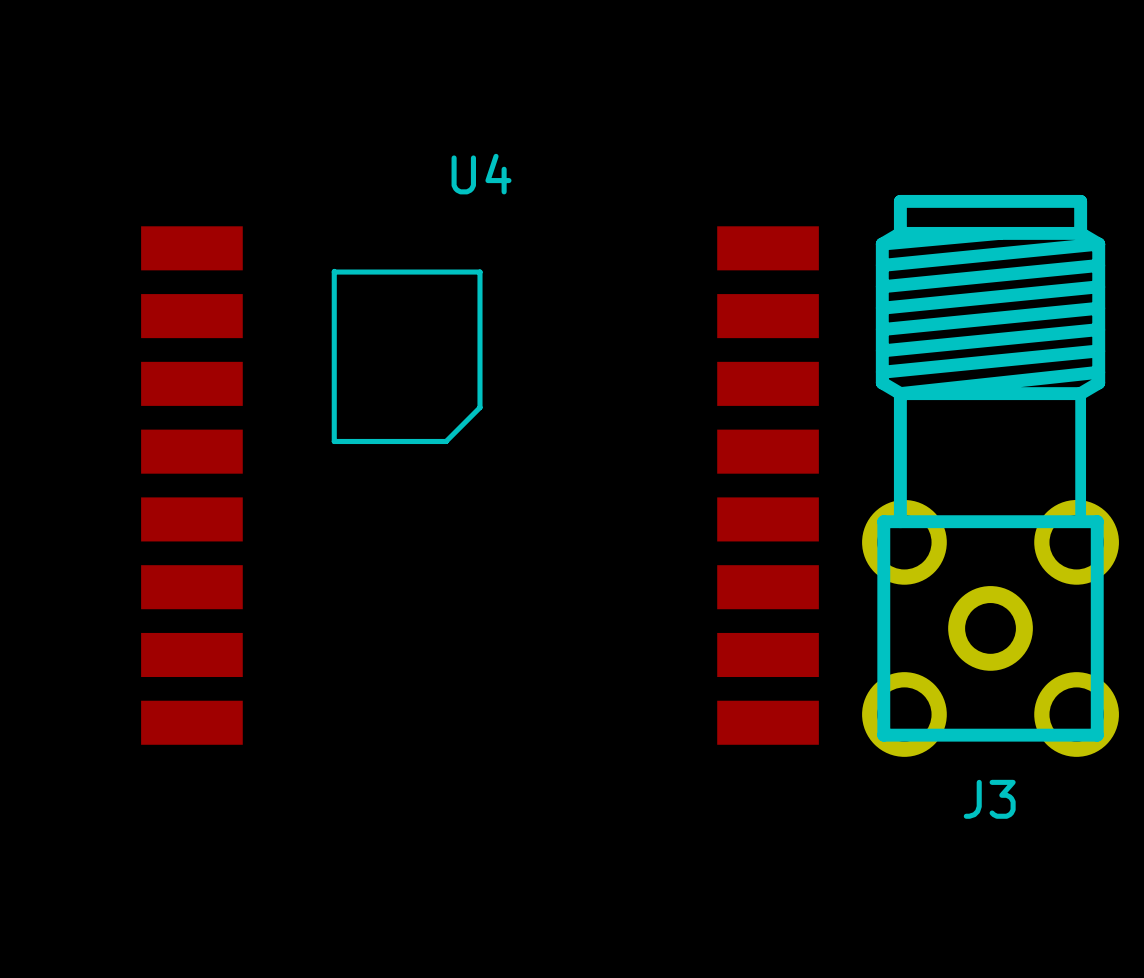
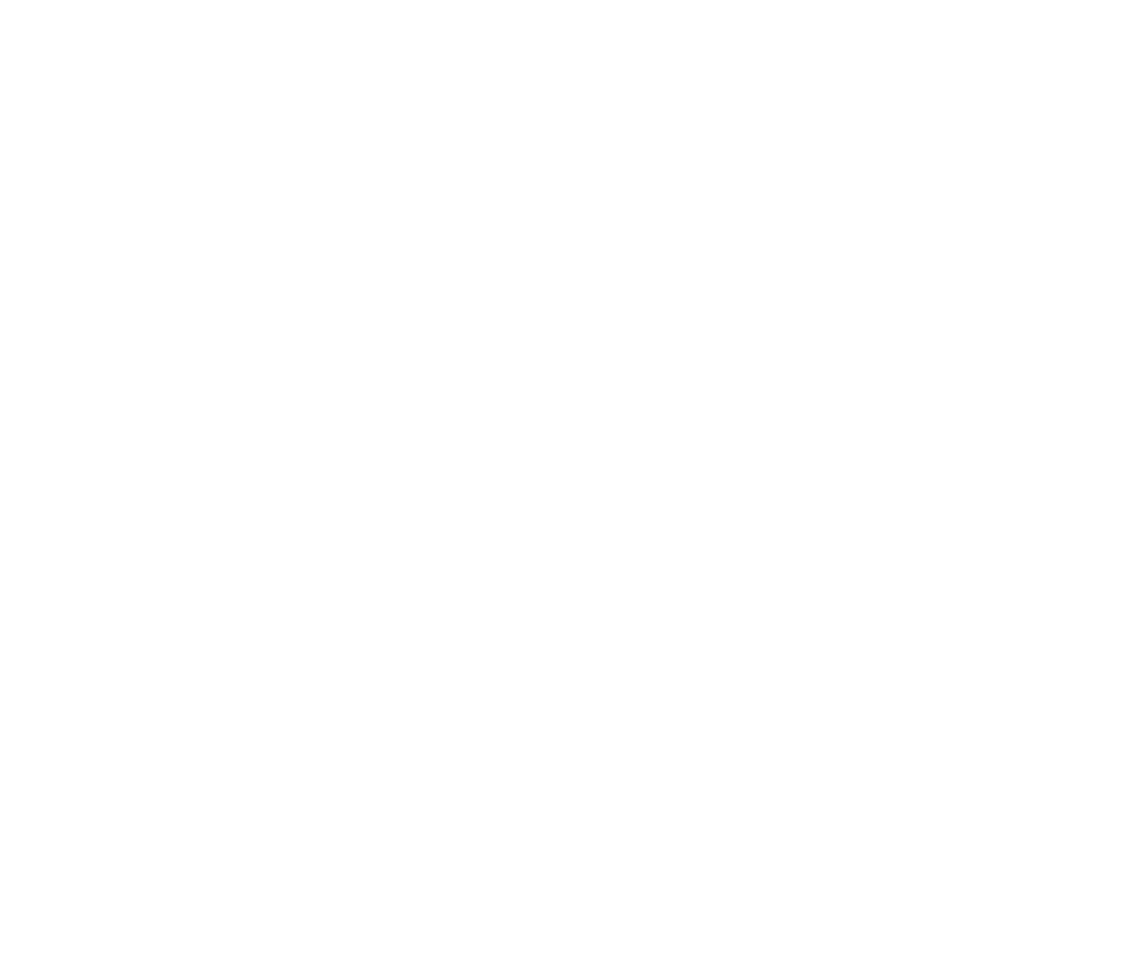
J3: (990, 475) -> none
U4: (479, 485) -> none

